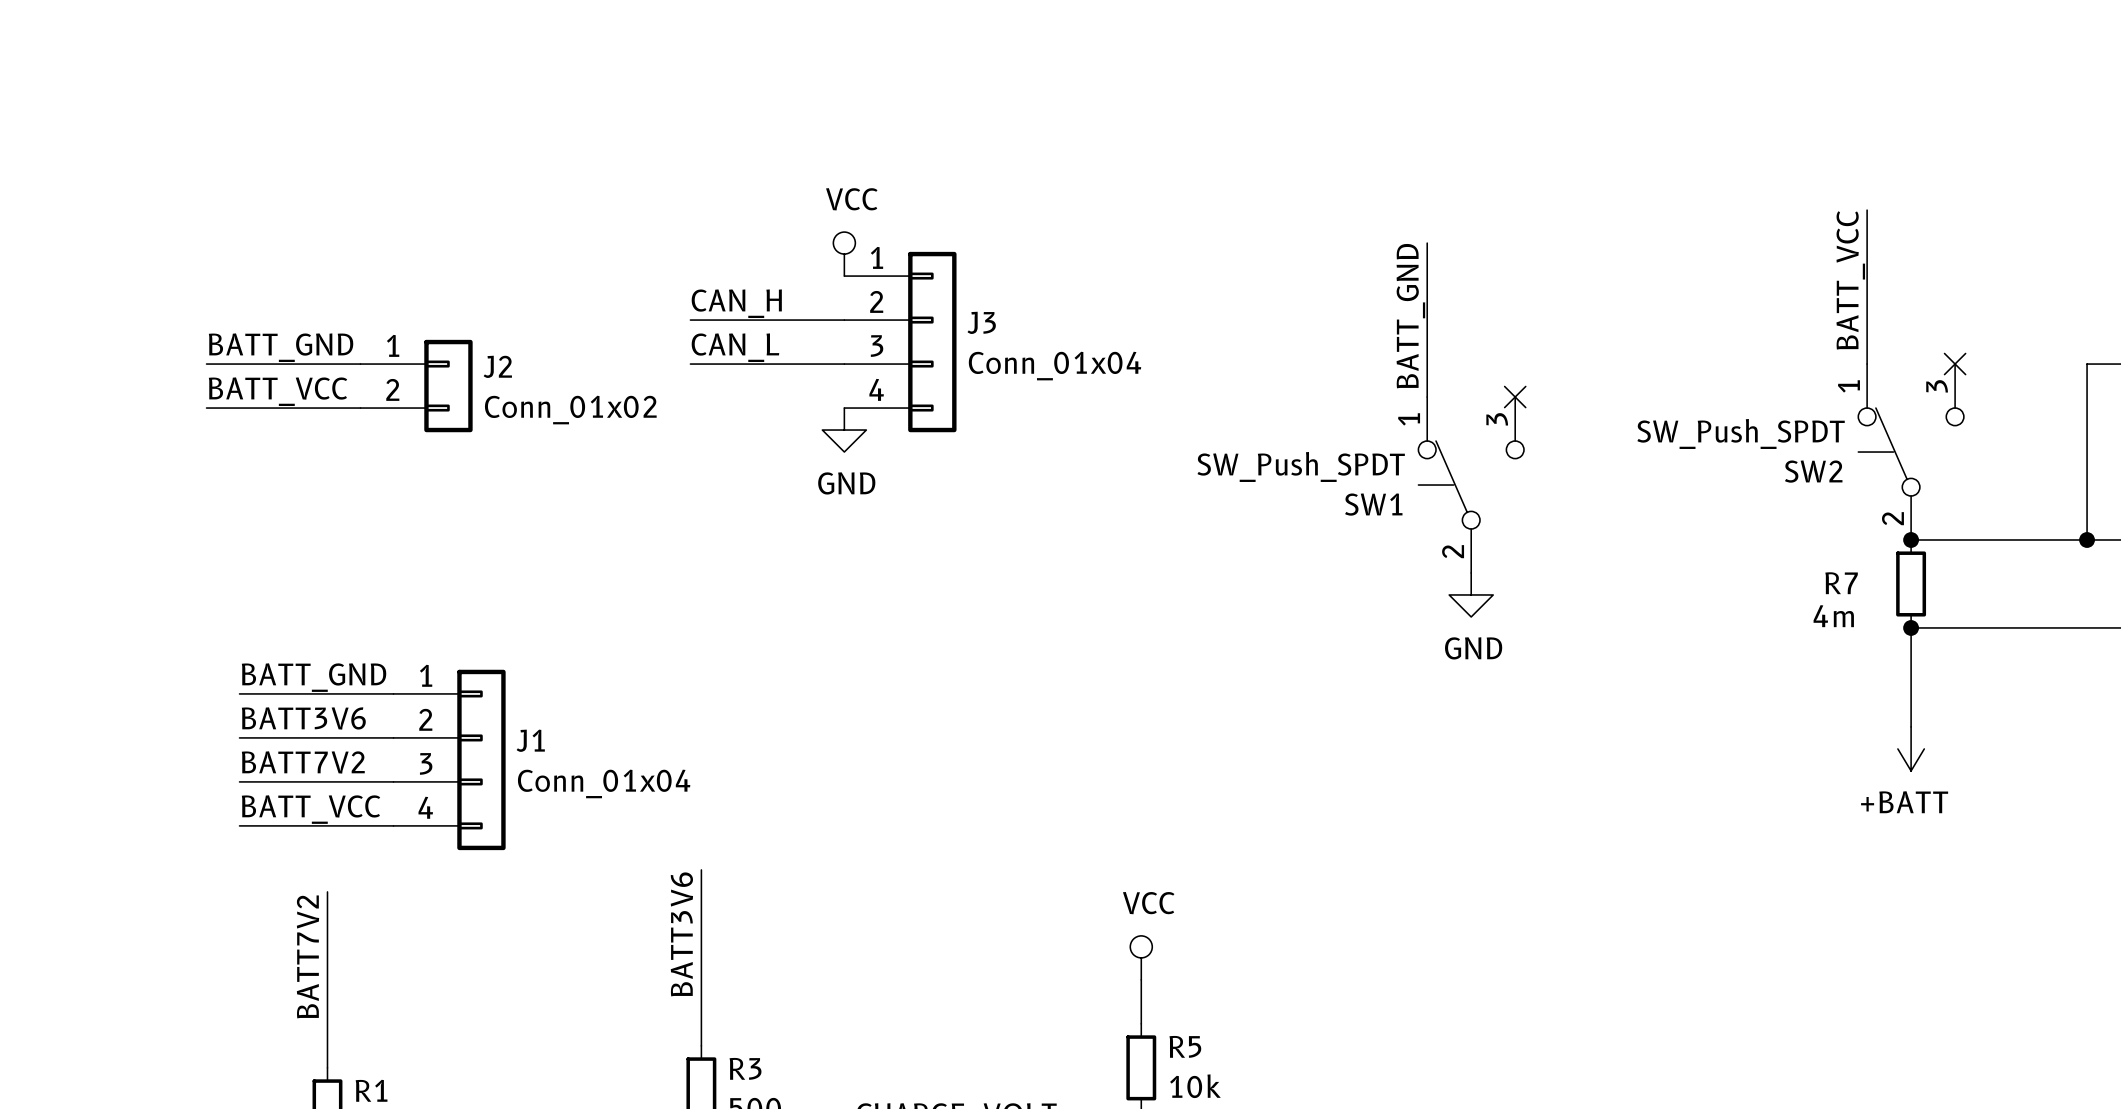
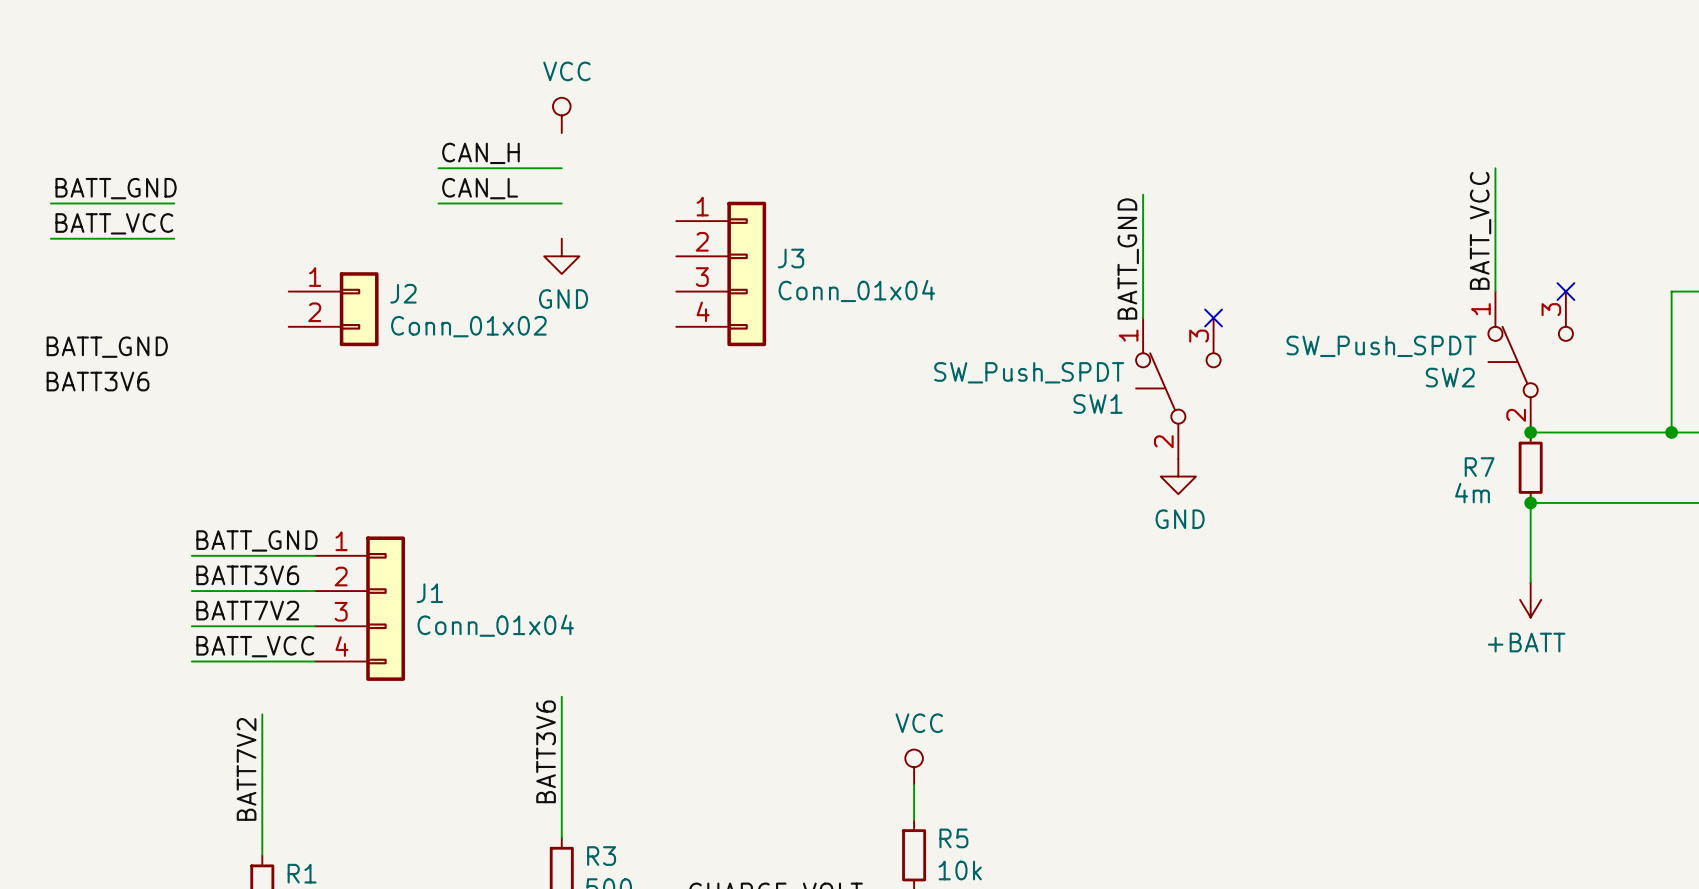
label: none -> BATT_GND (116, 188)
power symbol position: VCC (844, 254) -> VCC (561, 115)
label position: CAN_H (736, 303) -> CAN_H (480, 153)
wire: (690, 320) (844, 320) -> (438, 168) (561, 168)
label: BATT_GND (281, 347) -> none
label position: CAN_L (735, 347) -> CAN_L (480, 188)
wire: (206, 364) (360, 364) -> (50, 203) (174, 203)
wire: (690, 364) (844, 364) -> (438, 203) (561, 203)
label position: BATT_VCC (278, 391) -> BATT_VCC (114, 223)
wire: (206, 408) (360, 408) -> (50, 238) (174, 238)
power symbol position: GND (844, 430) -> GND (561, 256)
label: none -> BATT_GND (107, 347)
label: none -> BATT3V6 (98, 381)

